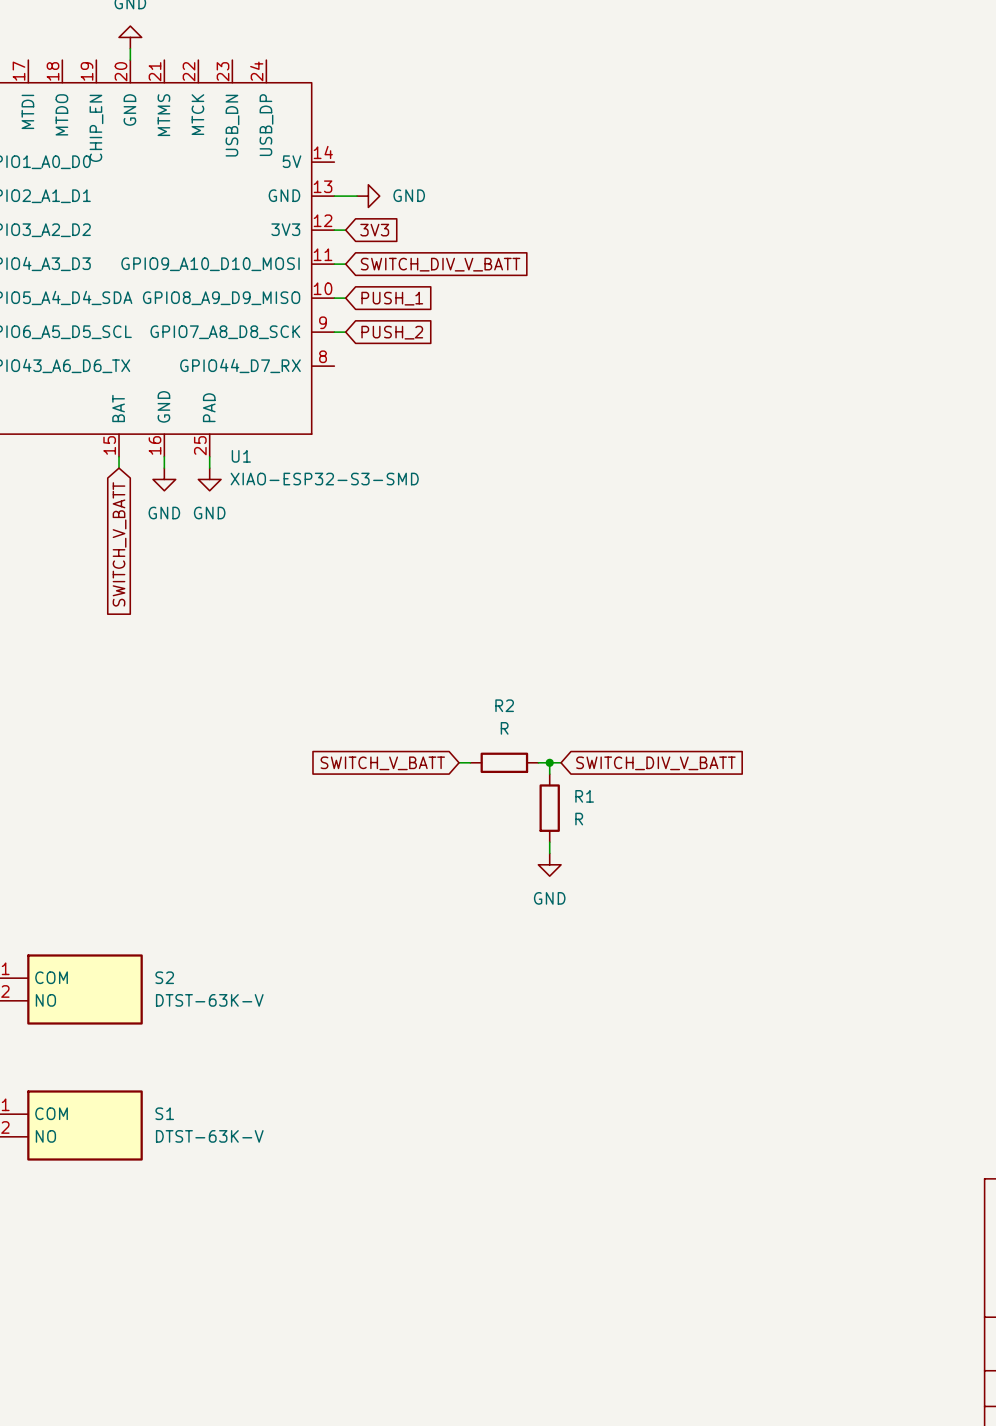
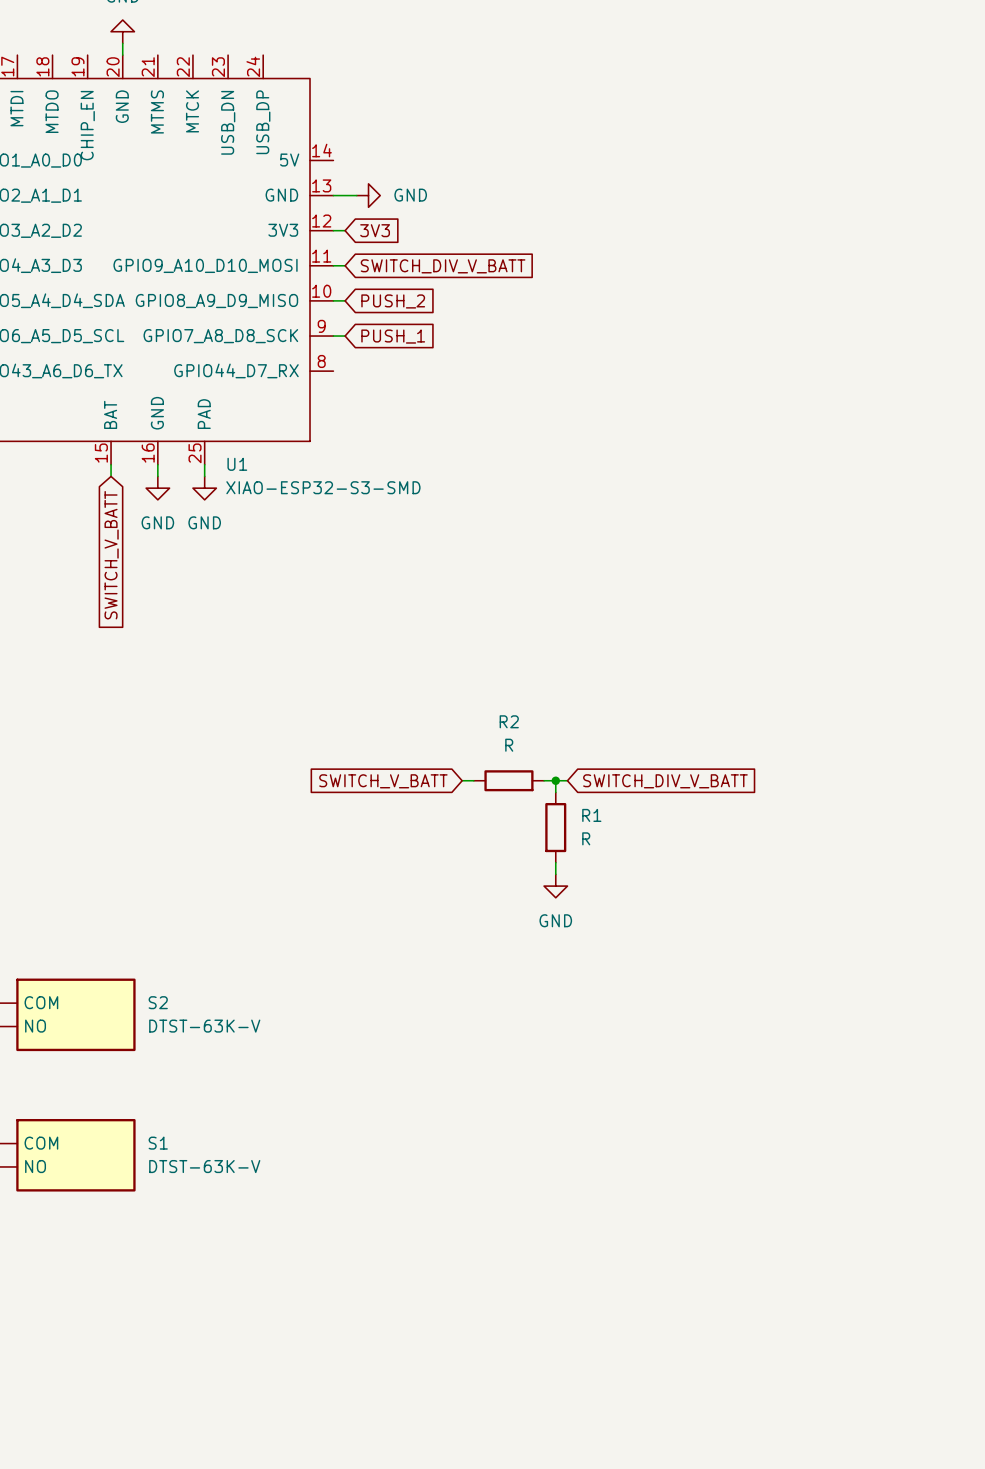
global label: PUSH_1 (392, 298) -> PUSH_2 (393, 301)
global label: PUSH_2 (392, 332) -> PUSH_1 (393, 336)

